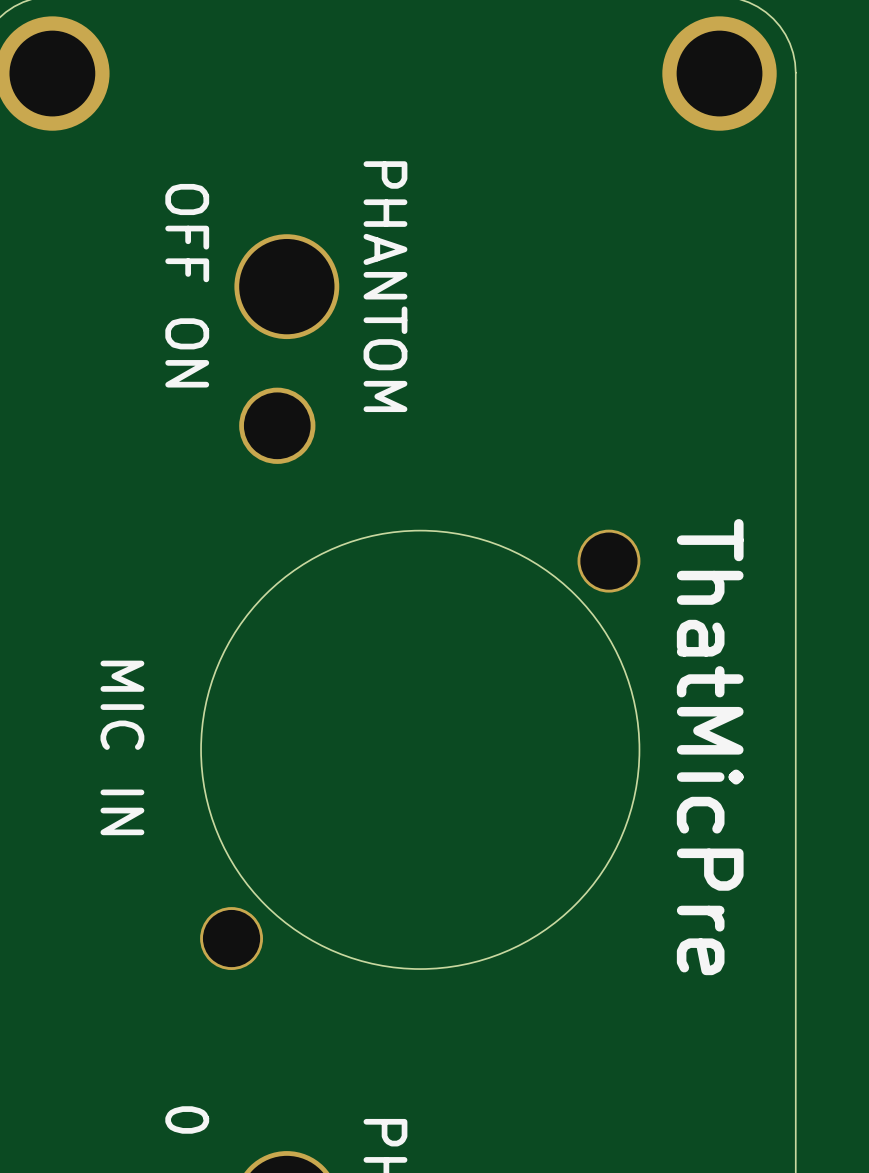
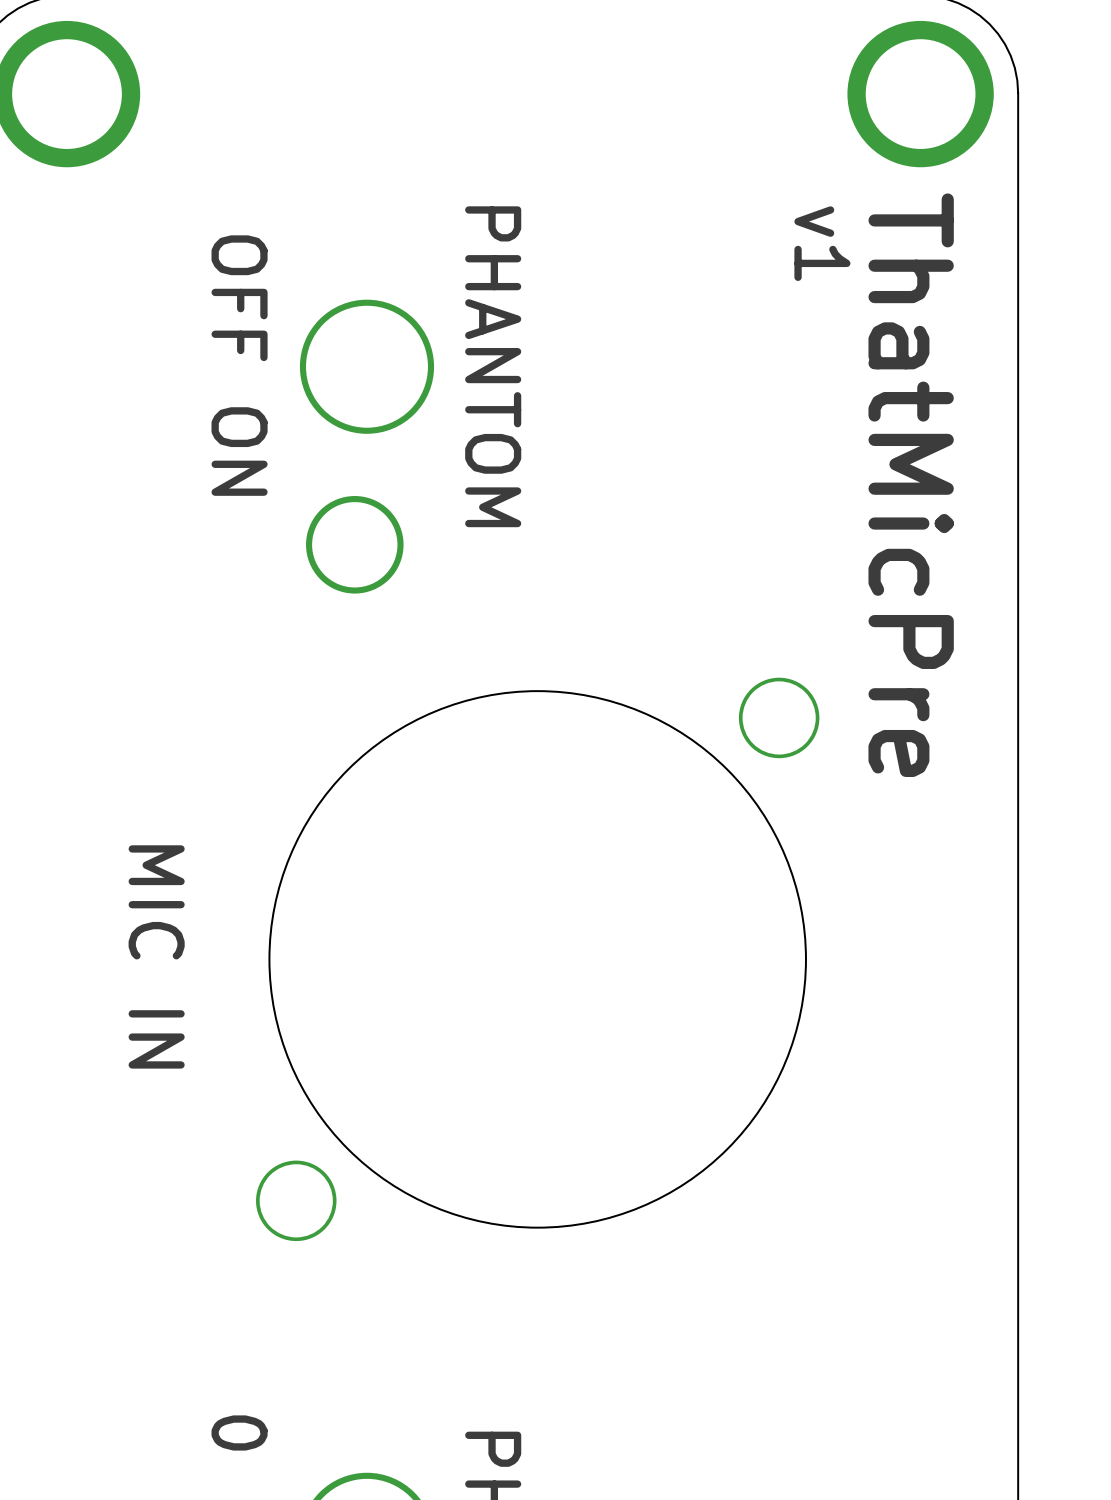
text: none -> v1 (822, 243)
round board edge size: [200, 530, 640, 970] -> [268, 690, 807, 1229]
text position: ThatMicPre (710, 747) -> ThatMicPre (911, 485)

